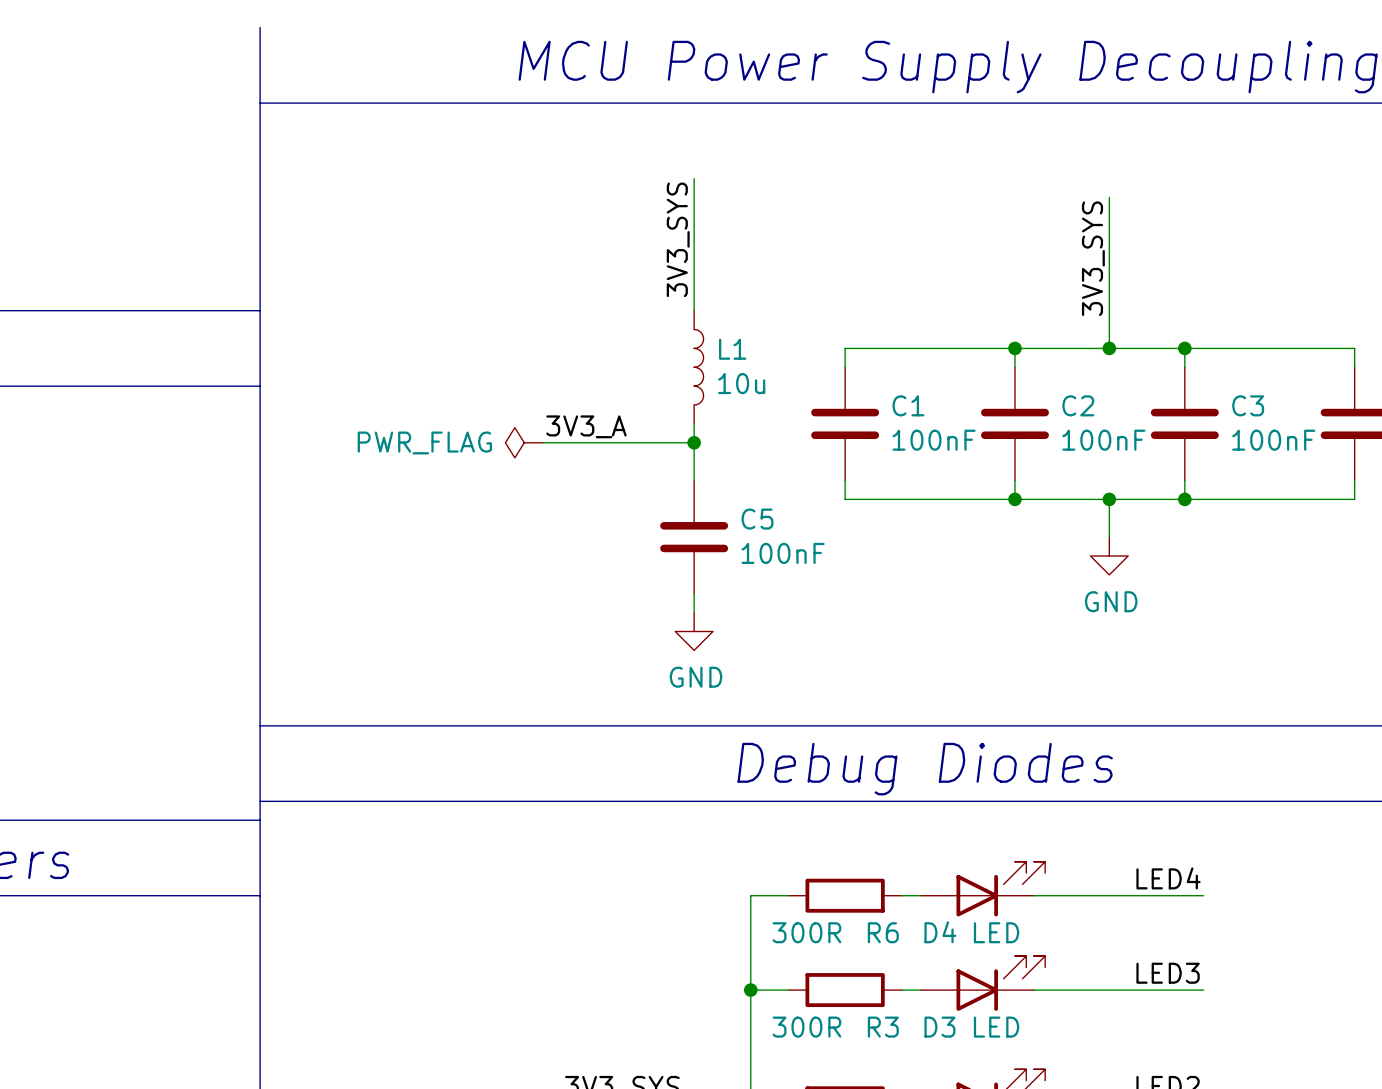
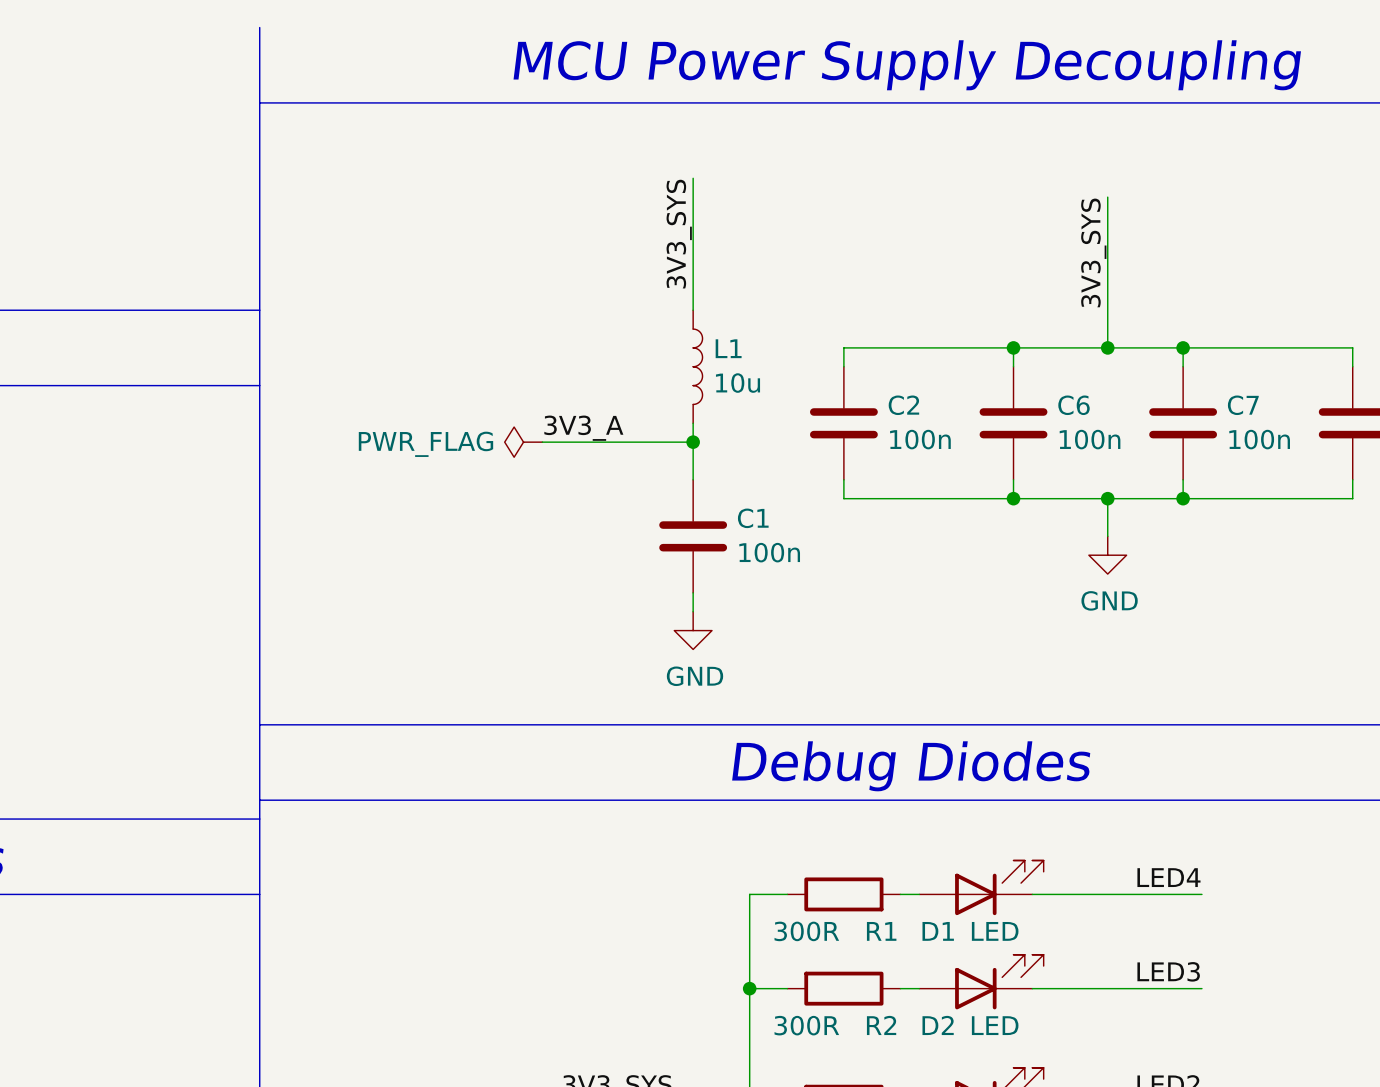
C1 name: C1 (908, 405) -> C2 (903, 405)
C2 name: C2 (1078, 405) -> C6 (1074, 405)
C3 name: C3 (1248, 405) -> C7 (1243, 405)
C1 value: 100nF (934, 440) -> 100n (920, 439)
C2 value: 100nF (1103, 440) -> 100n (1090, 439)
C3 value: 100nF (1273, 440) -> 100n (1259, 439)
C5 name: C5 (757, 519) -> C1 (753, 518)
C5 value: 100nF (783, 553) -> 100n (769, 552)
R6 name: R6 (883, 932) -> R1 (881, 931)
D4 name: D4 (940, 932) -> D1 (938, 931)
R3 name: R3 (883, 1027) -> R2 (881, 1025)
D3 name: D3 (939, 1027) -> D2 (938, 1025)

